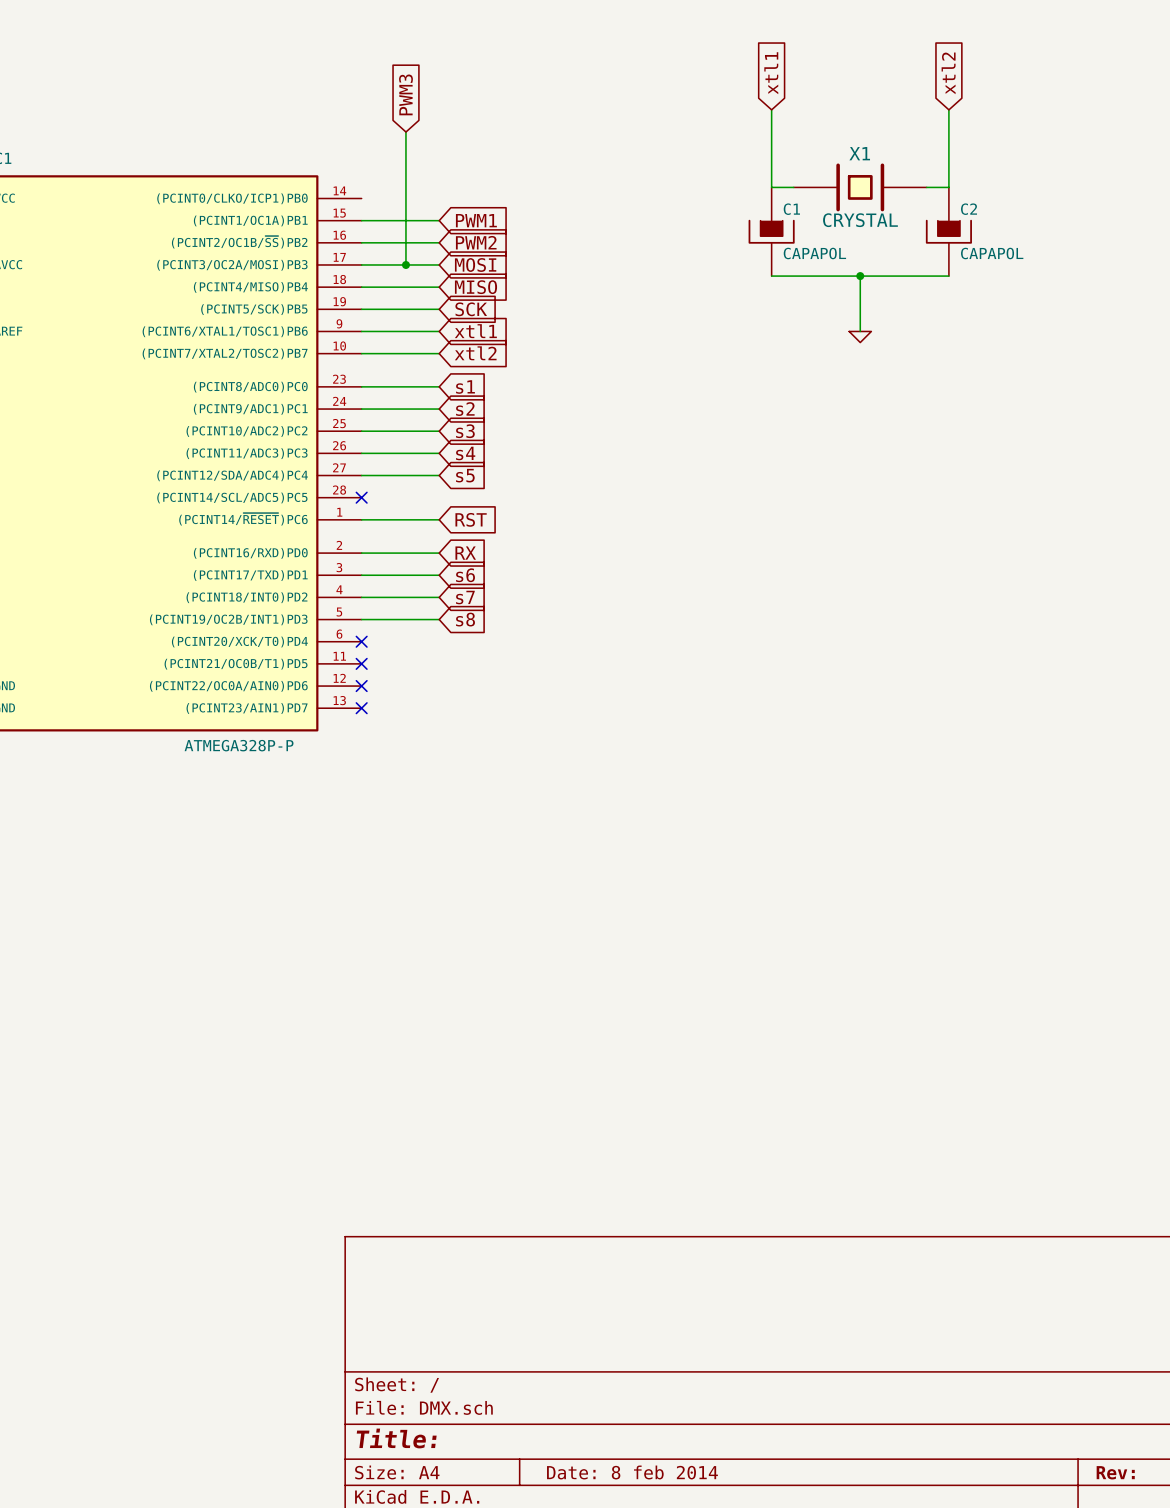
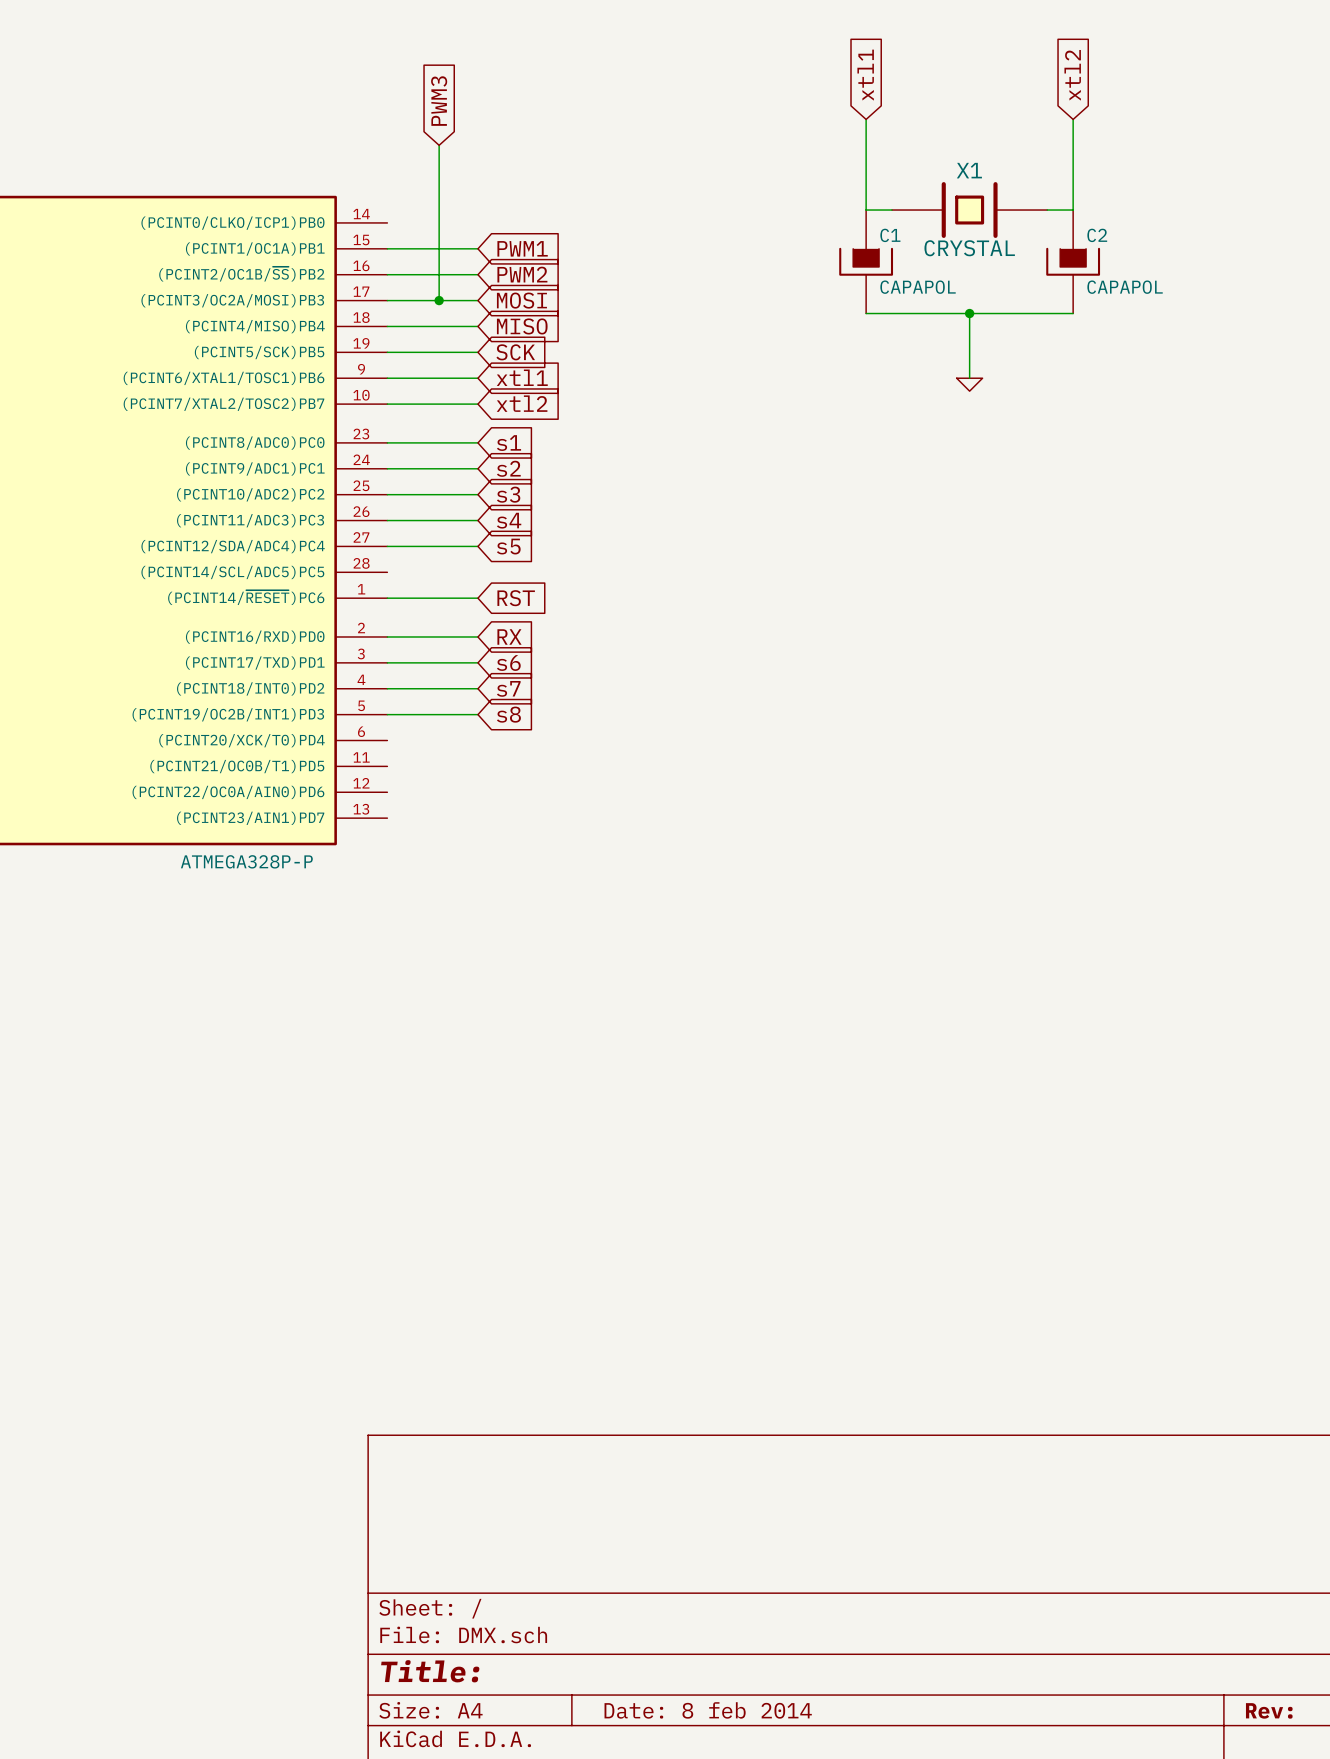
no-connect mark: (361, 497) -> none
no-connect mark: (361, 641) -> none
no-connect mark: (361, 663) -> none
no-connect mark: (361, 686) -> none
no-connect mark: (361, 708) -> none

